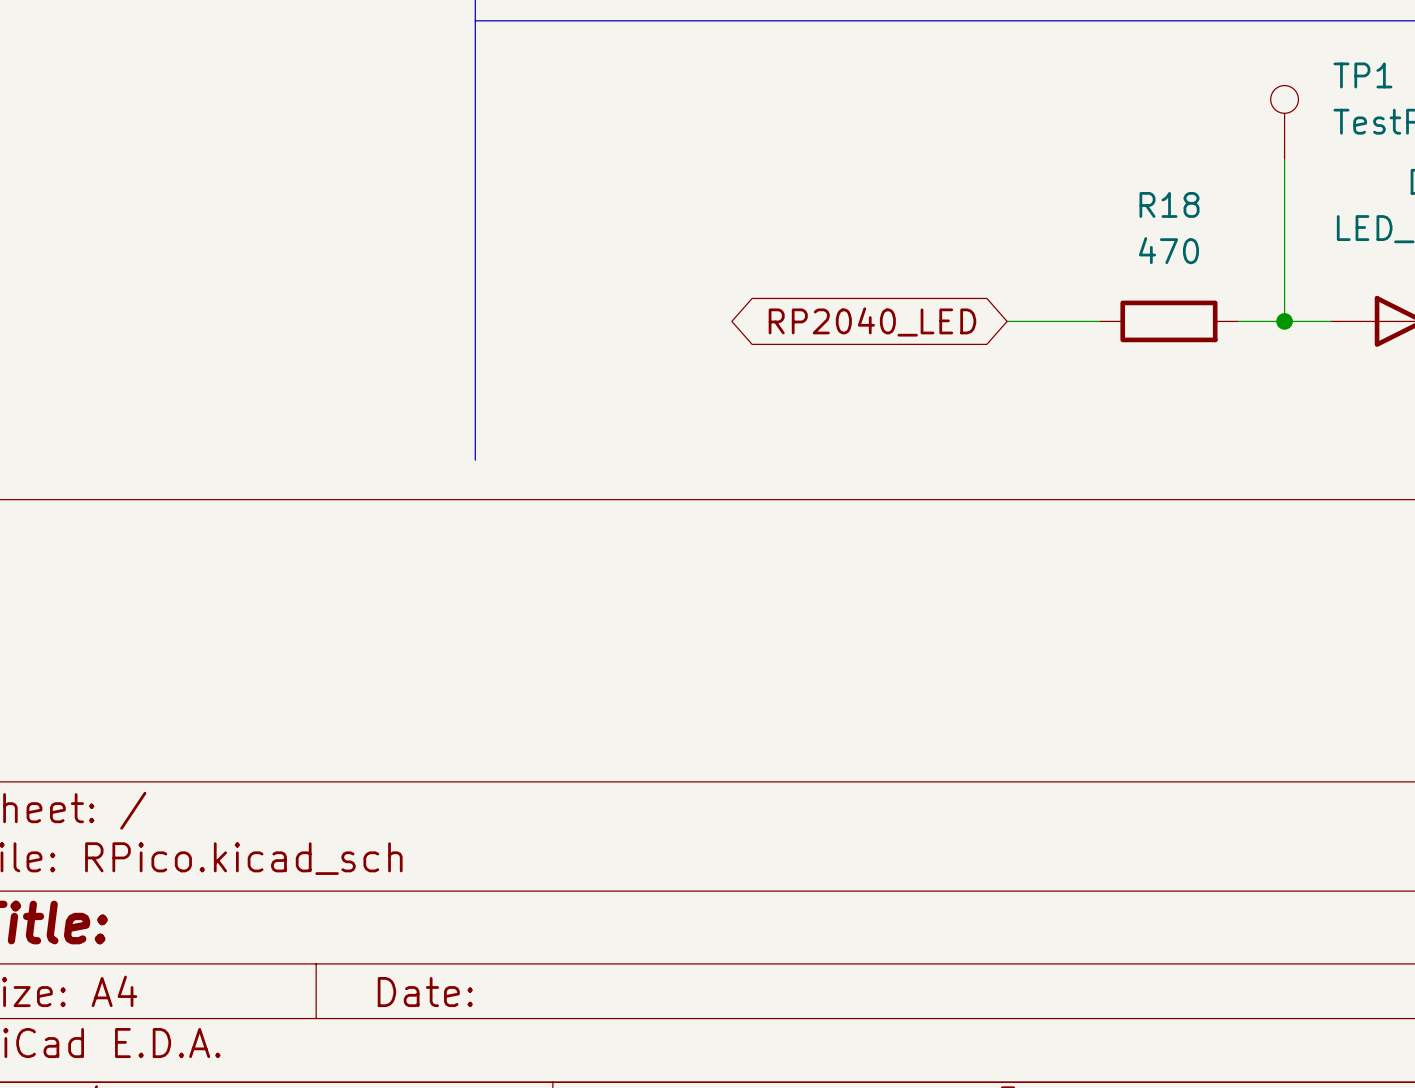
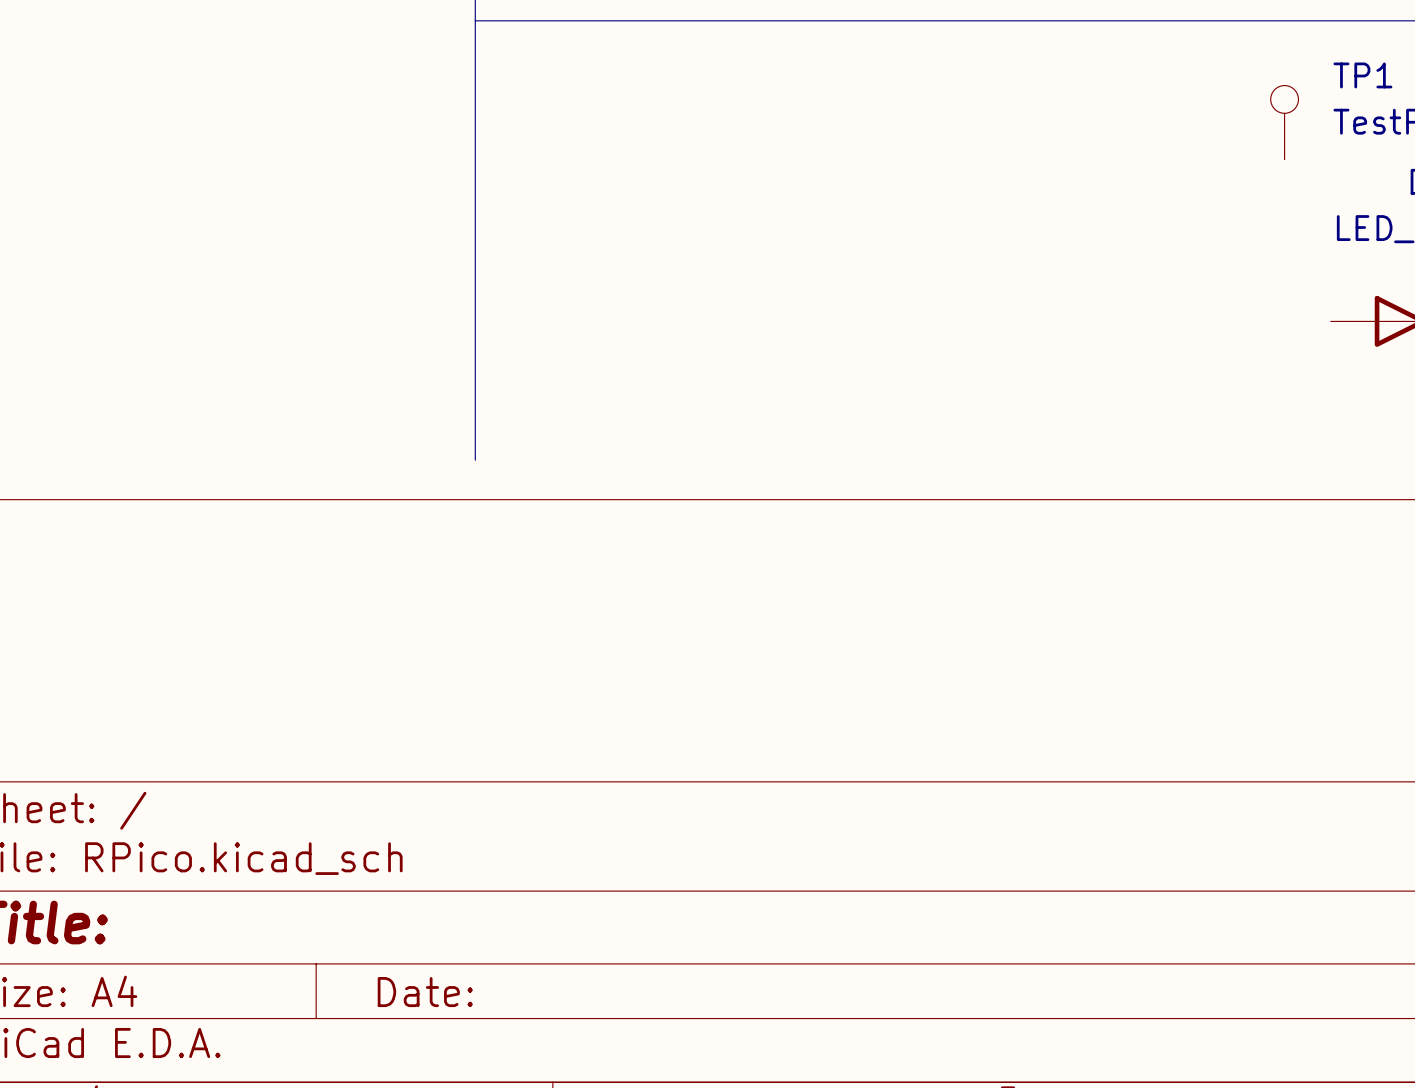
wire: (1284, 159) (1284, 321) -> none
global label: RP2040_LED (872, 321) -> none
wire: (1007, 321) (1099, 321) -> none
R18: 470 (1168, 321) -> none
wire: (1238, 321) (1330, 321) -> none
junction: (1284, 321) -> none

